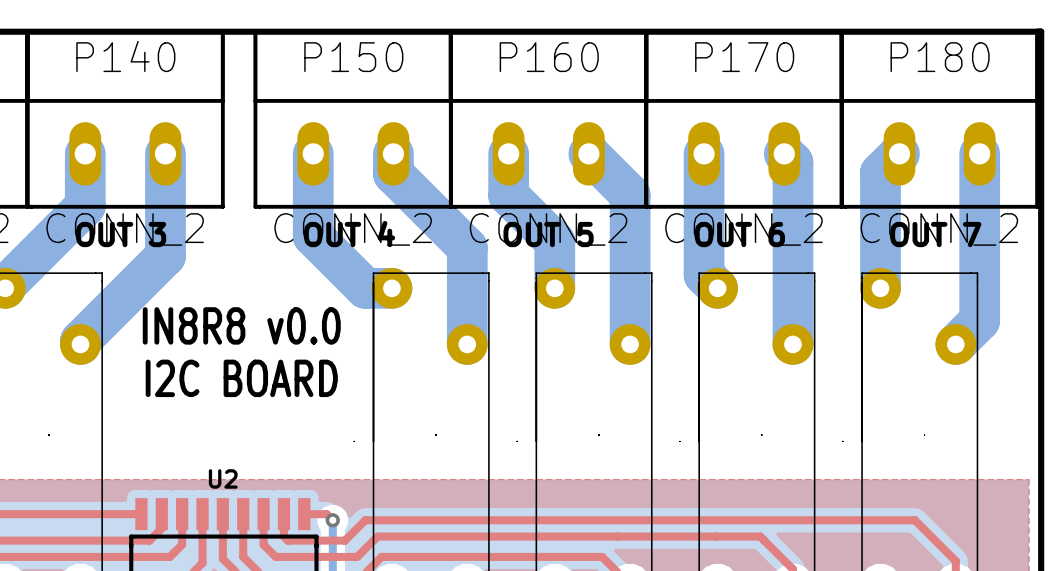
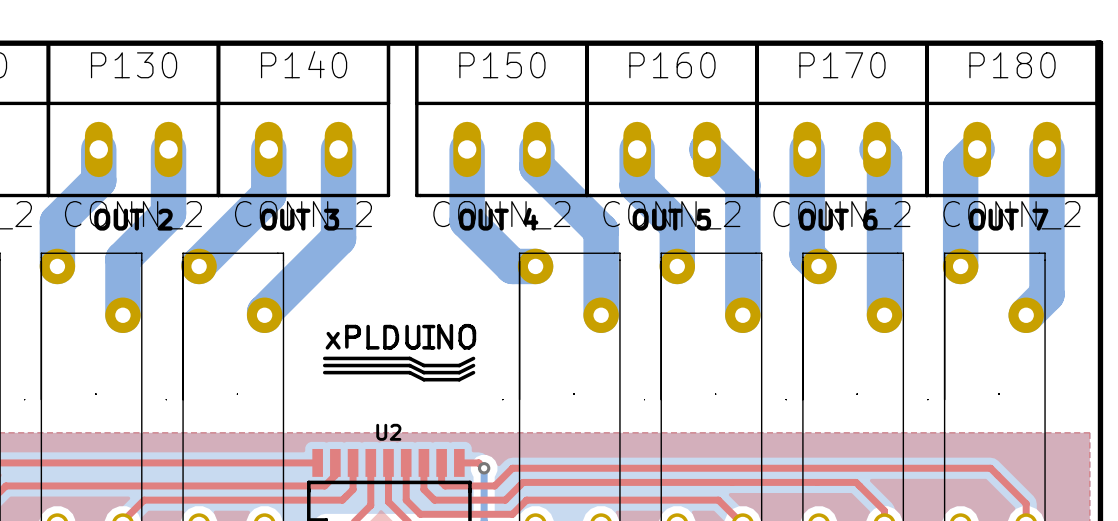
text: IN8R8 v0.0 (241, 325) -> none
drawing: none -> [322, 323, 477, 382]
text: I2C BOARD (241, 378) -> none

